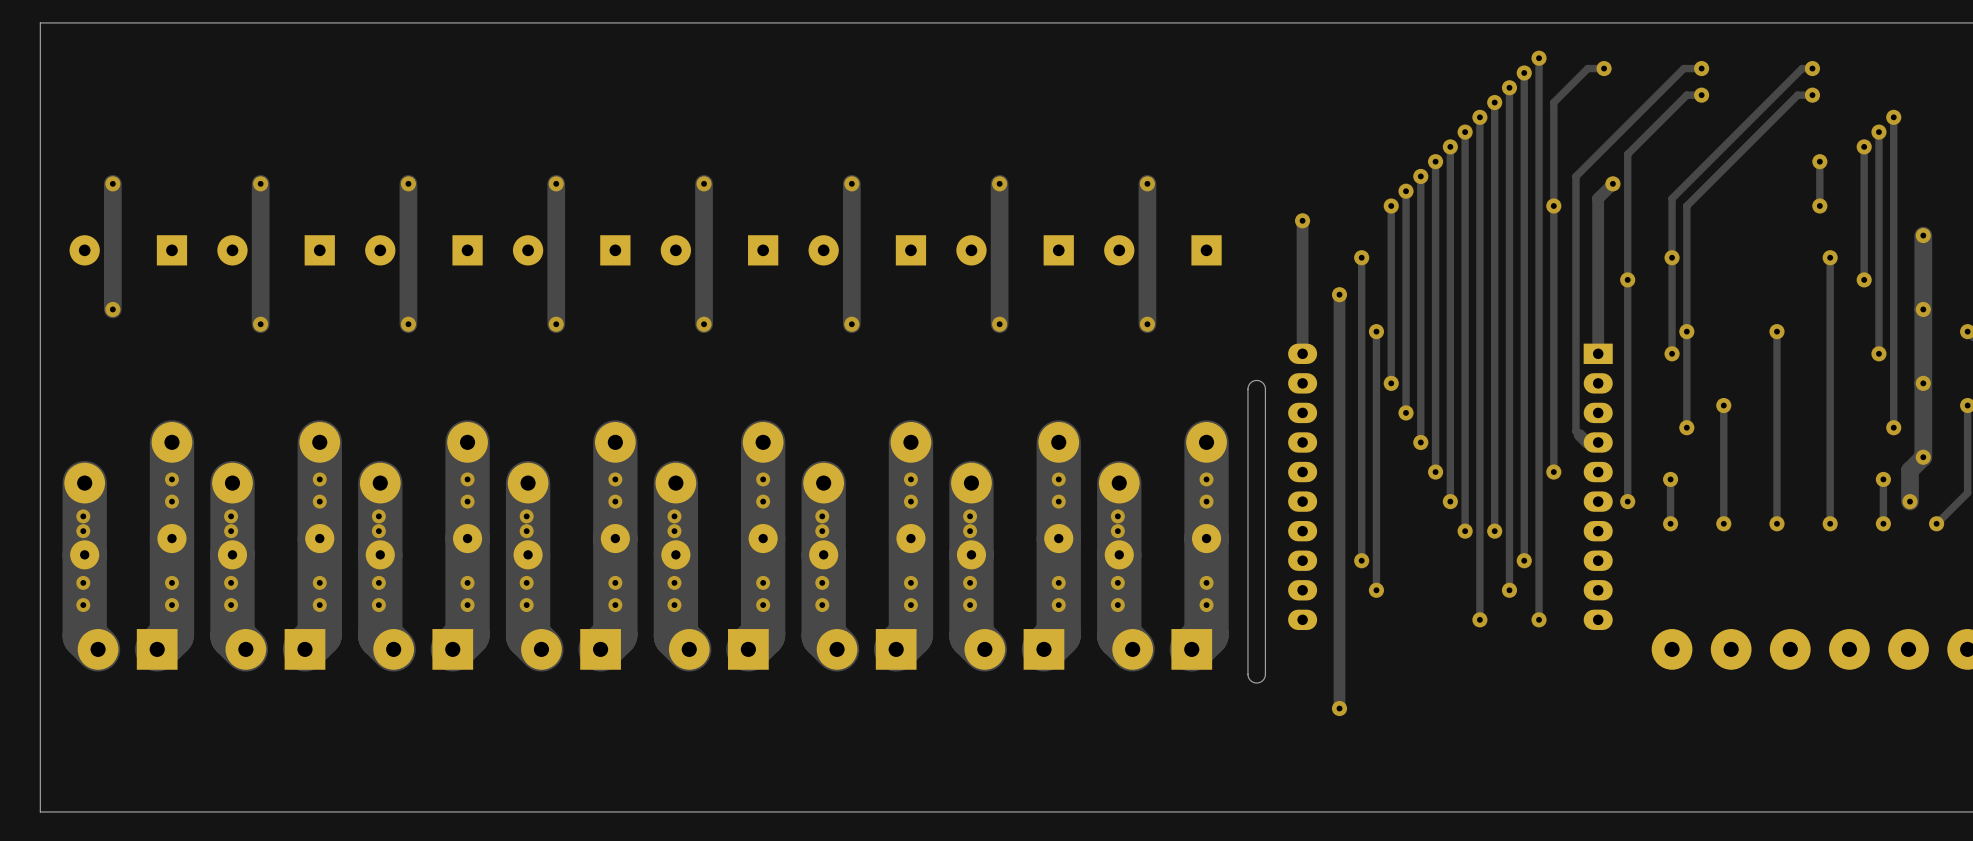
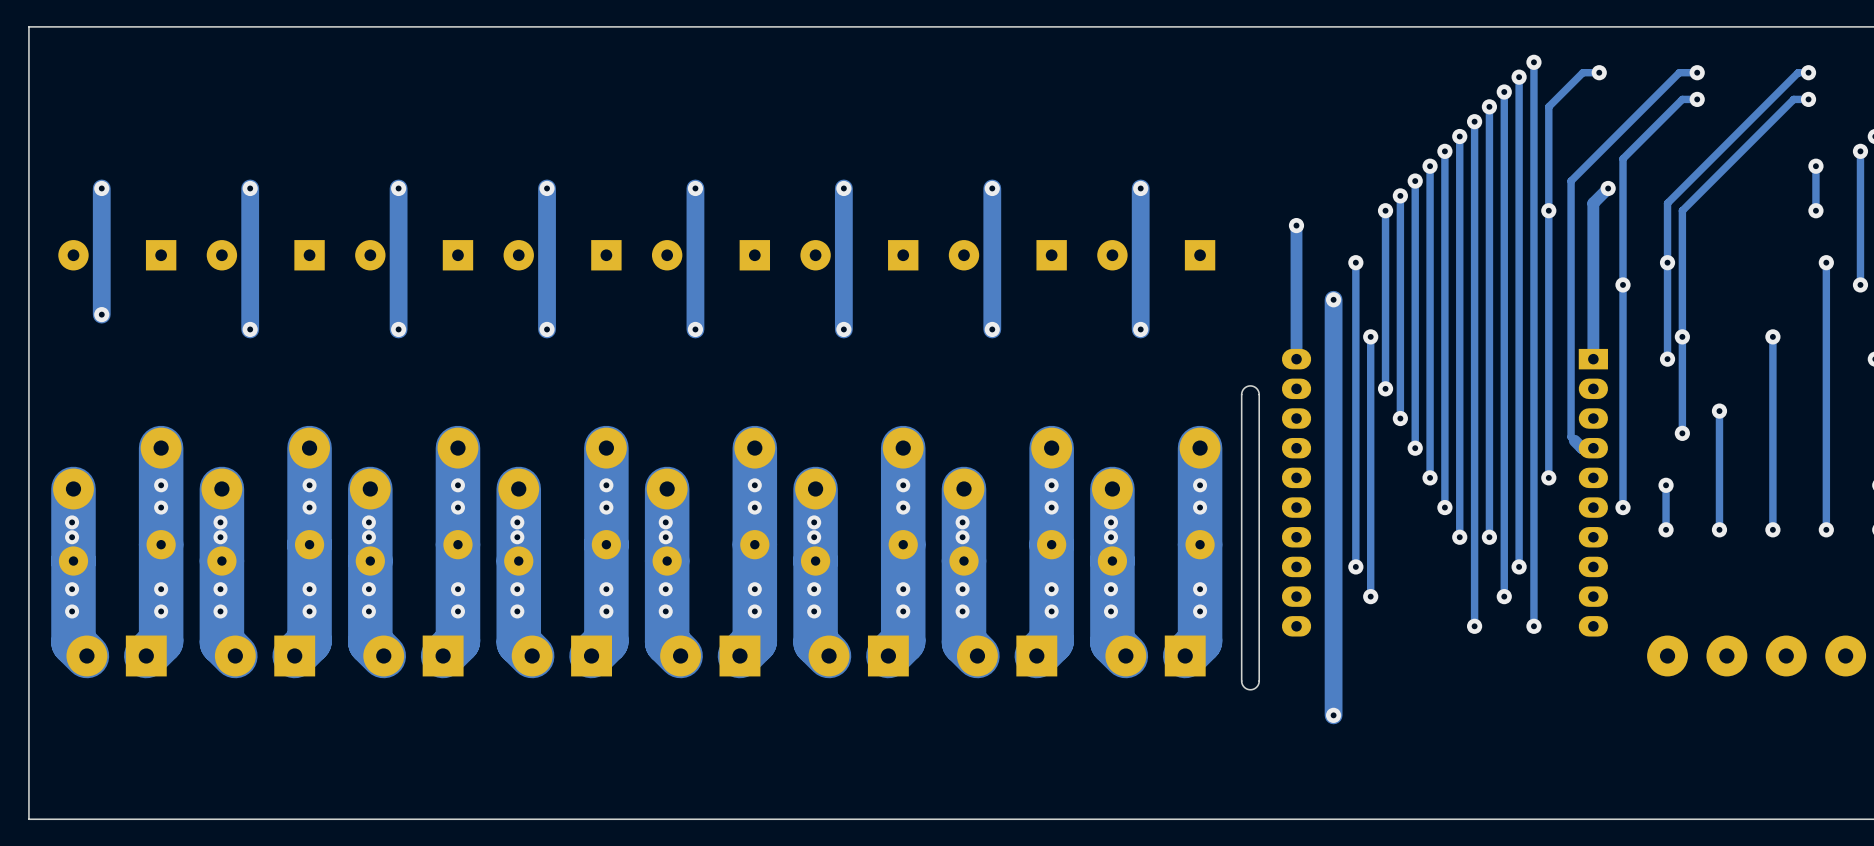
track width: thin (1339, 294) (1339, 708) -> thick (1333, 299) (1333, 715)

